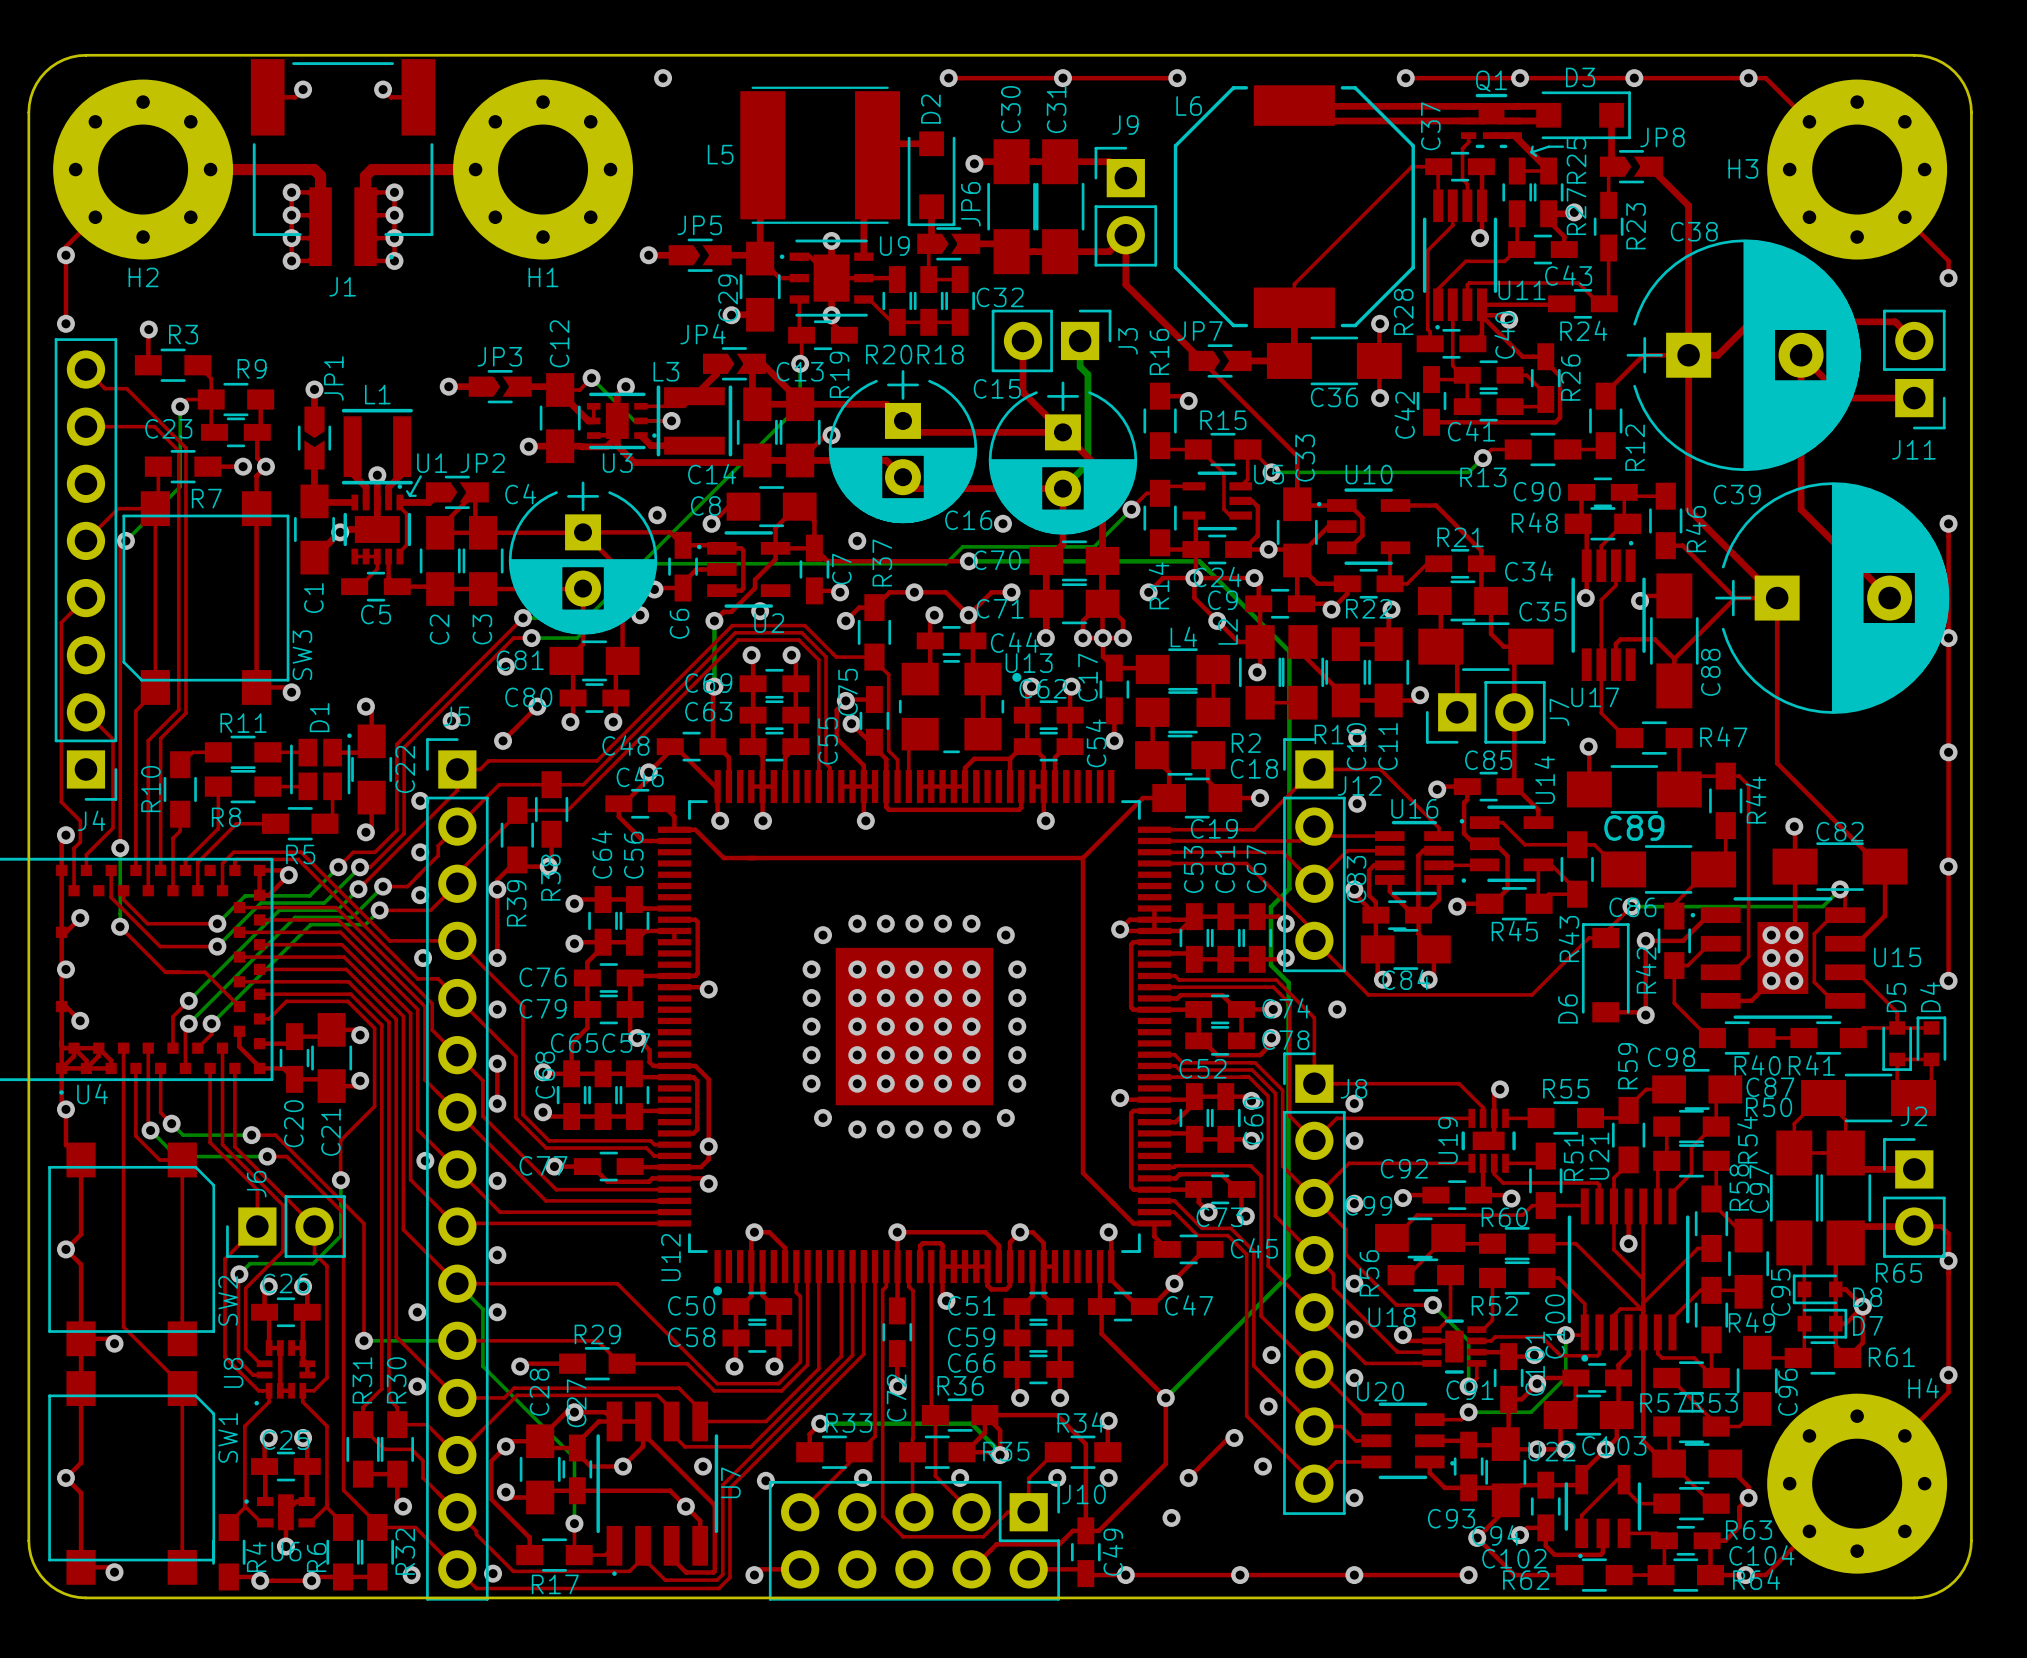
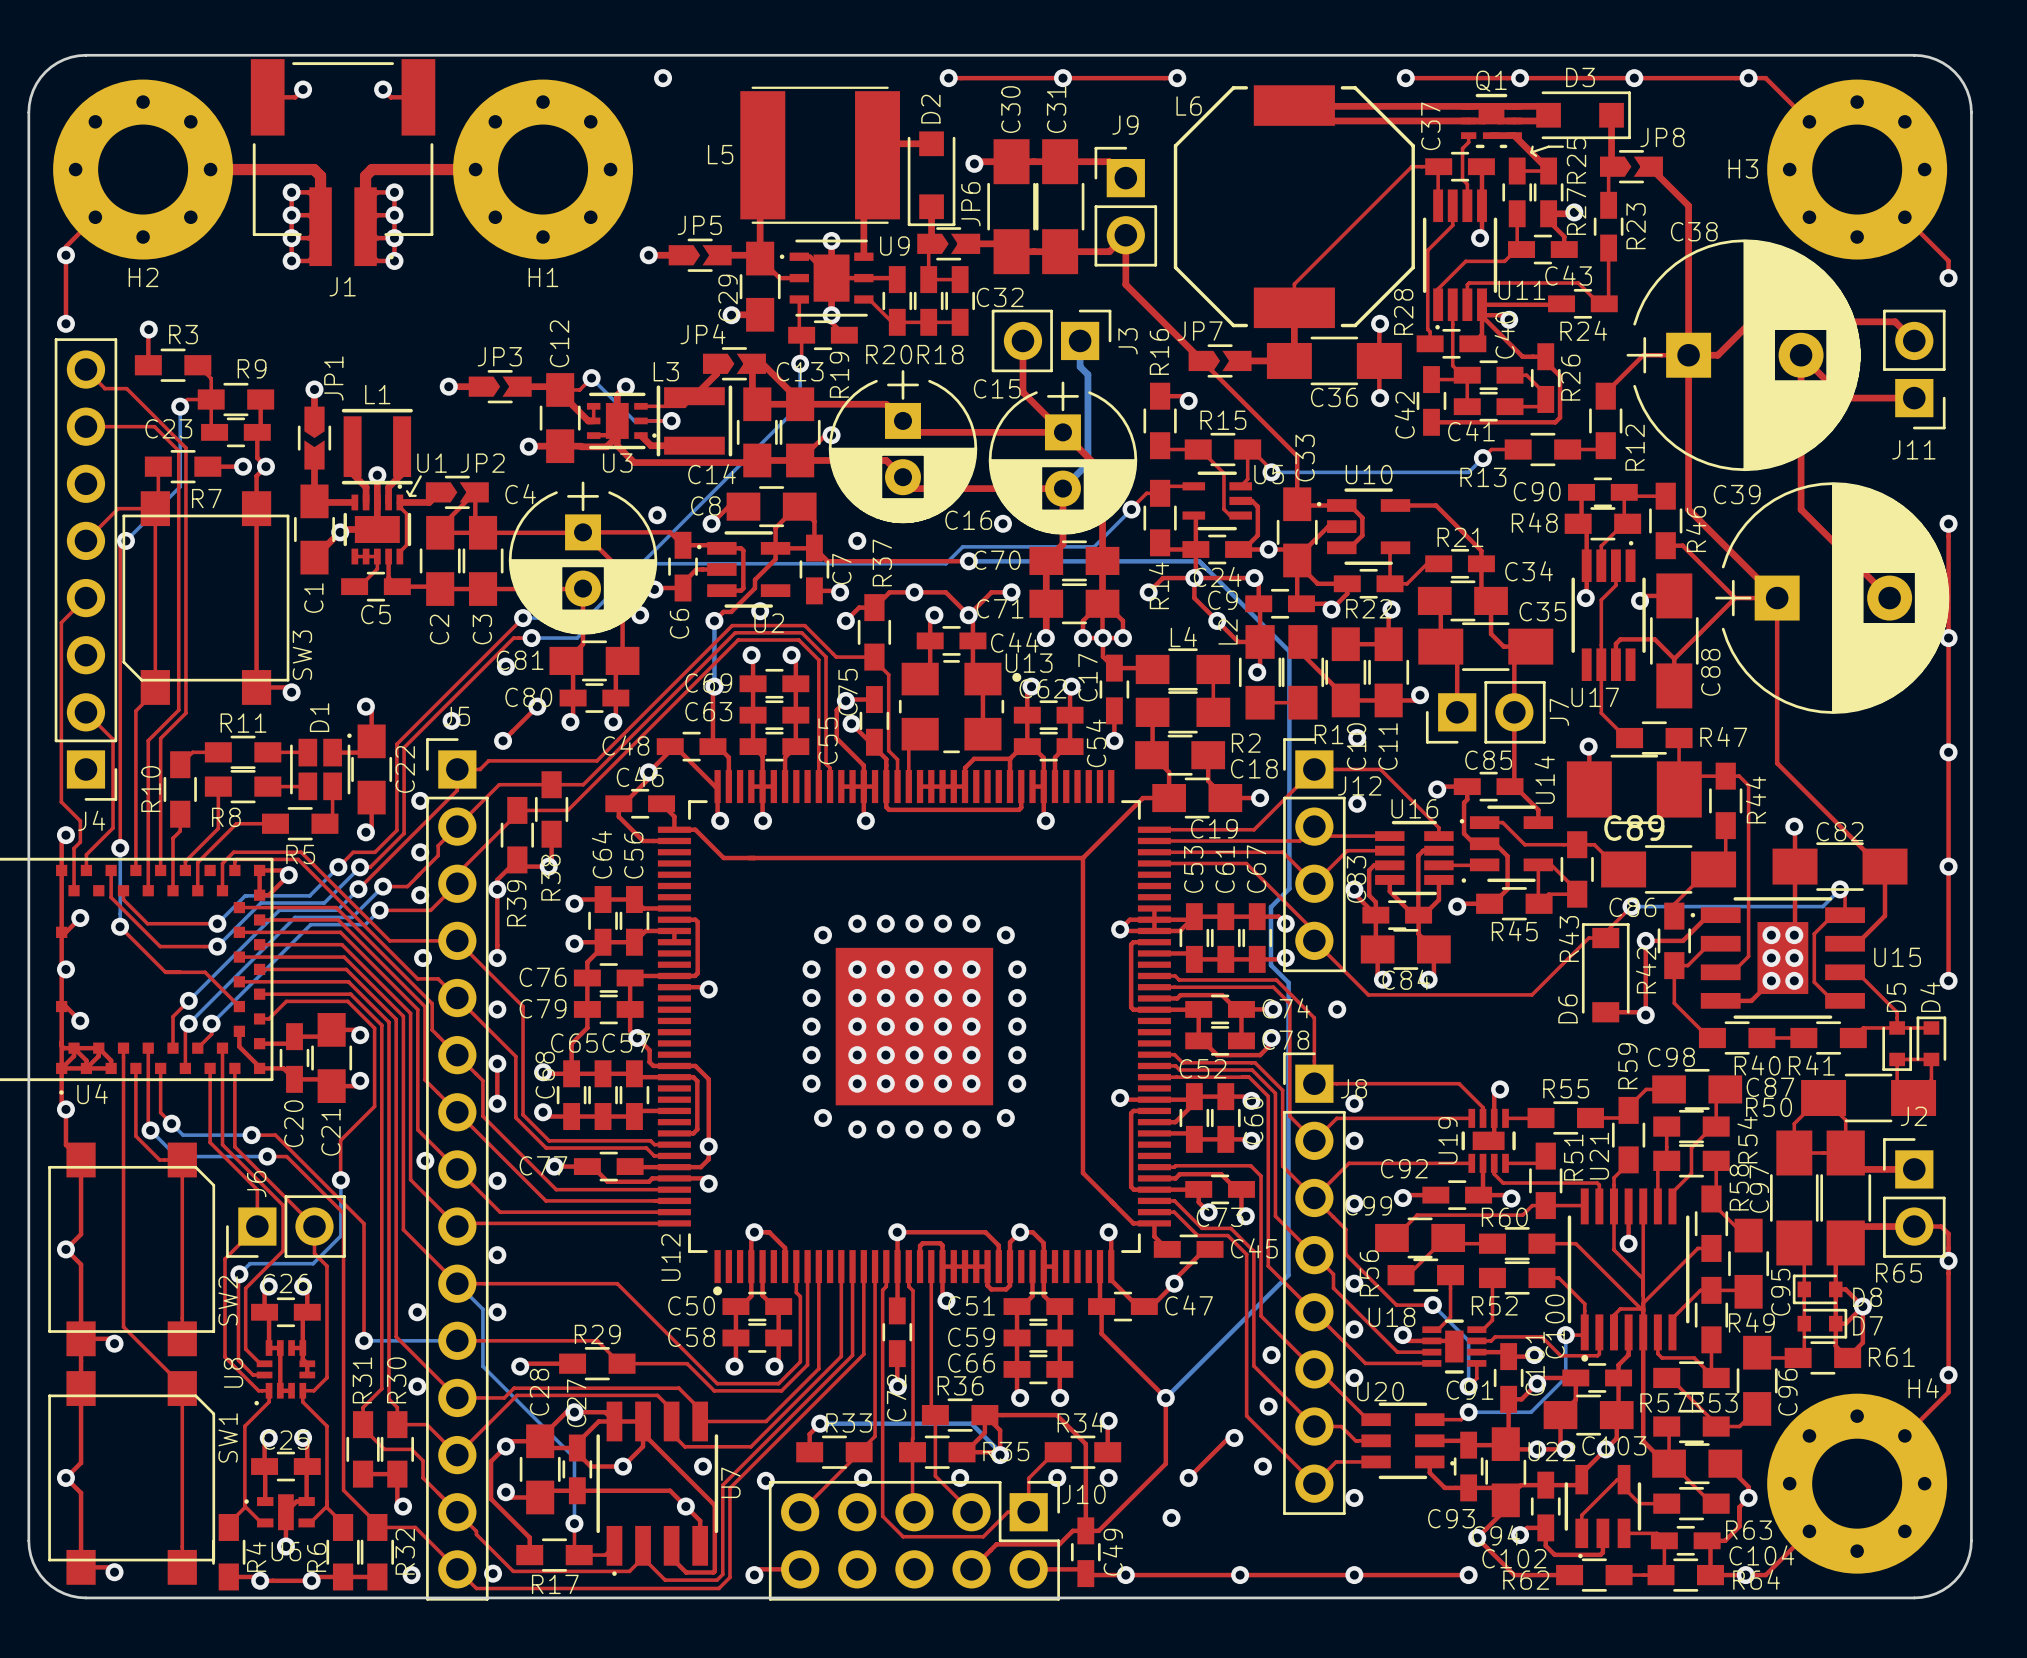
C89 footprint: [1566, 765, 1702, 814] -> [1566, 754, 1702, 825]

